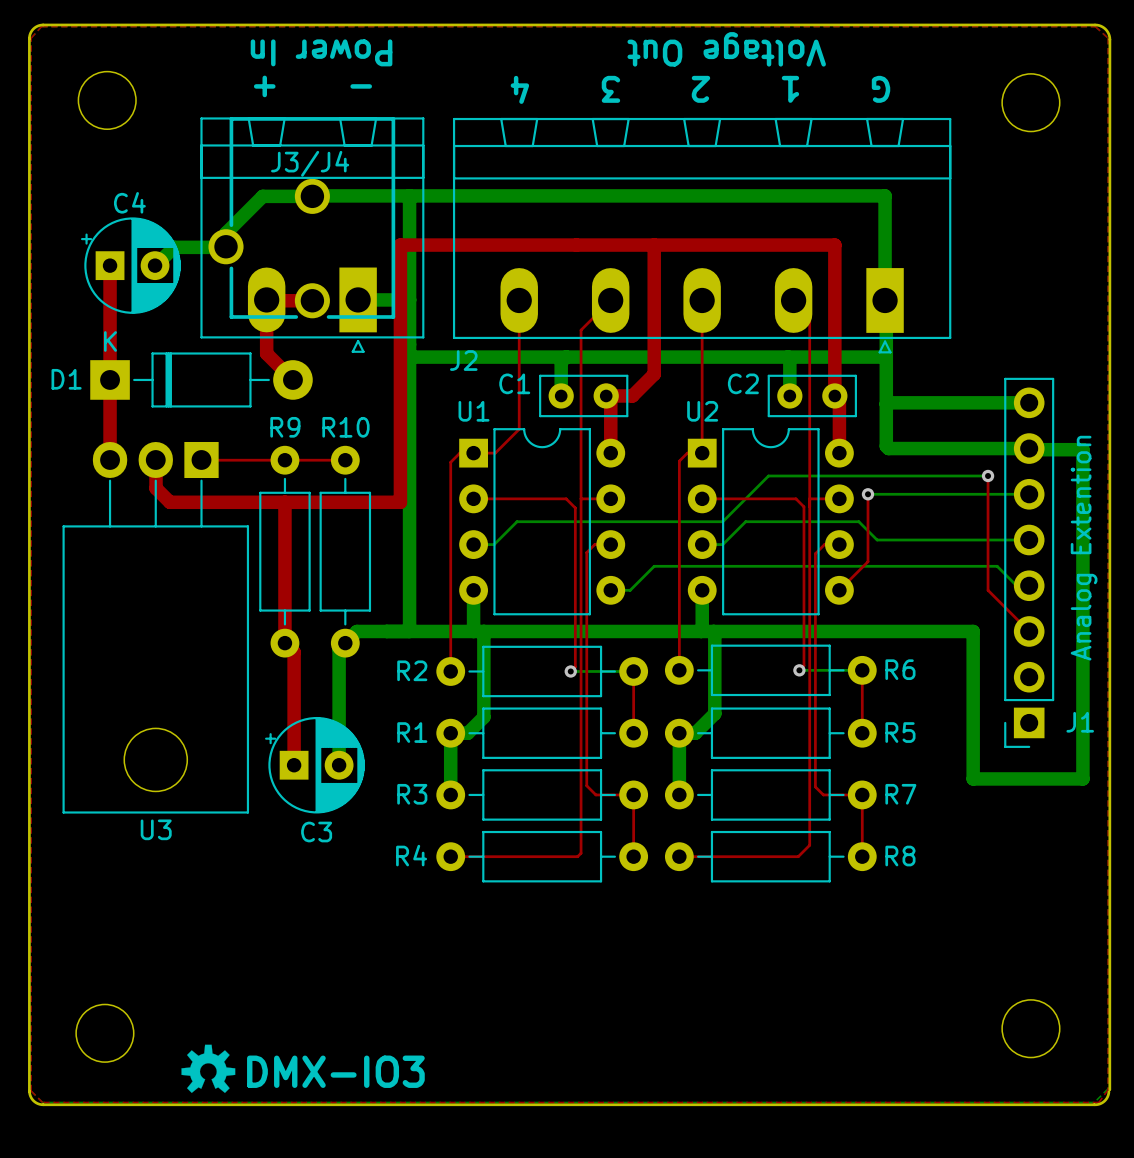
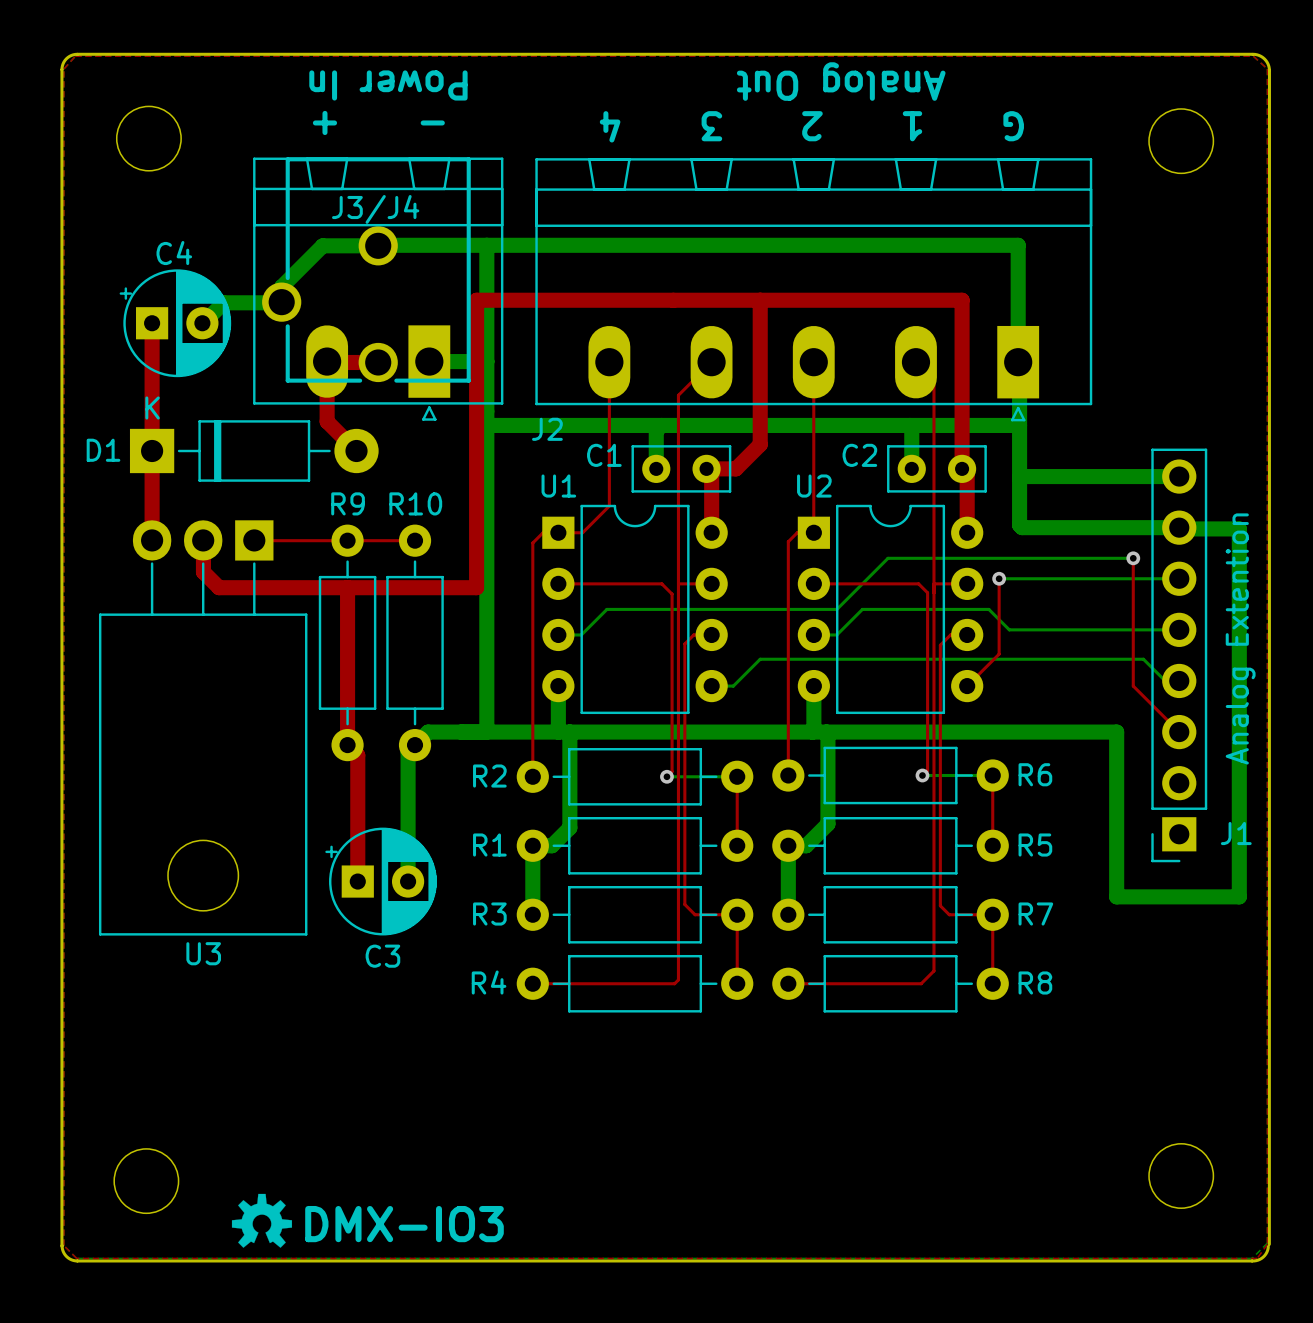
text: Voltage Out (726, 49) -> Analog Out (841, 81)

